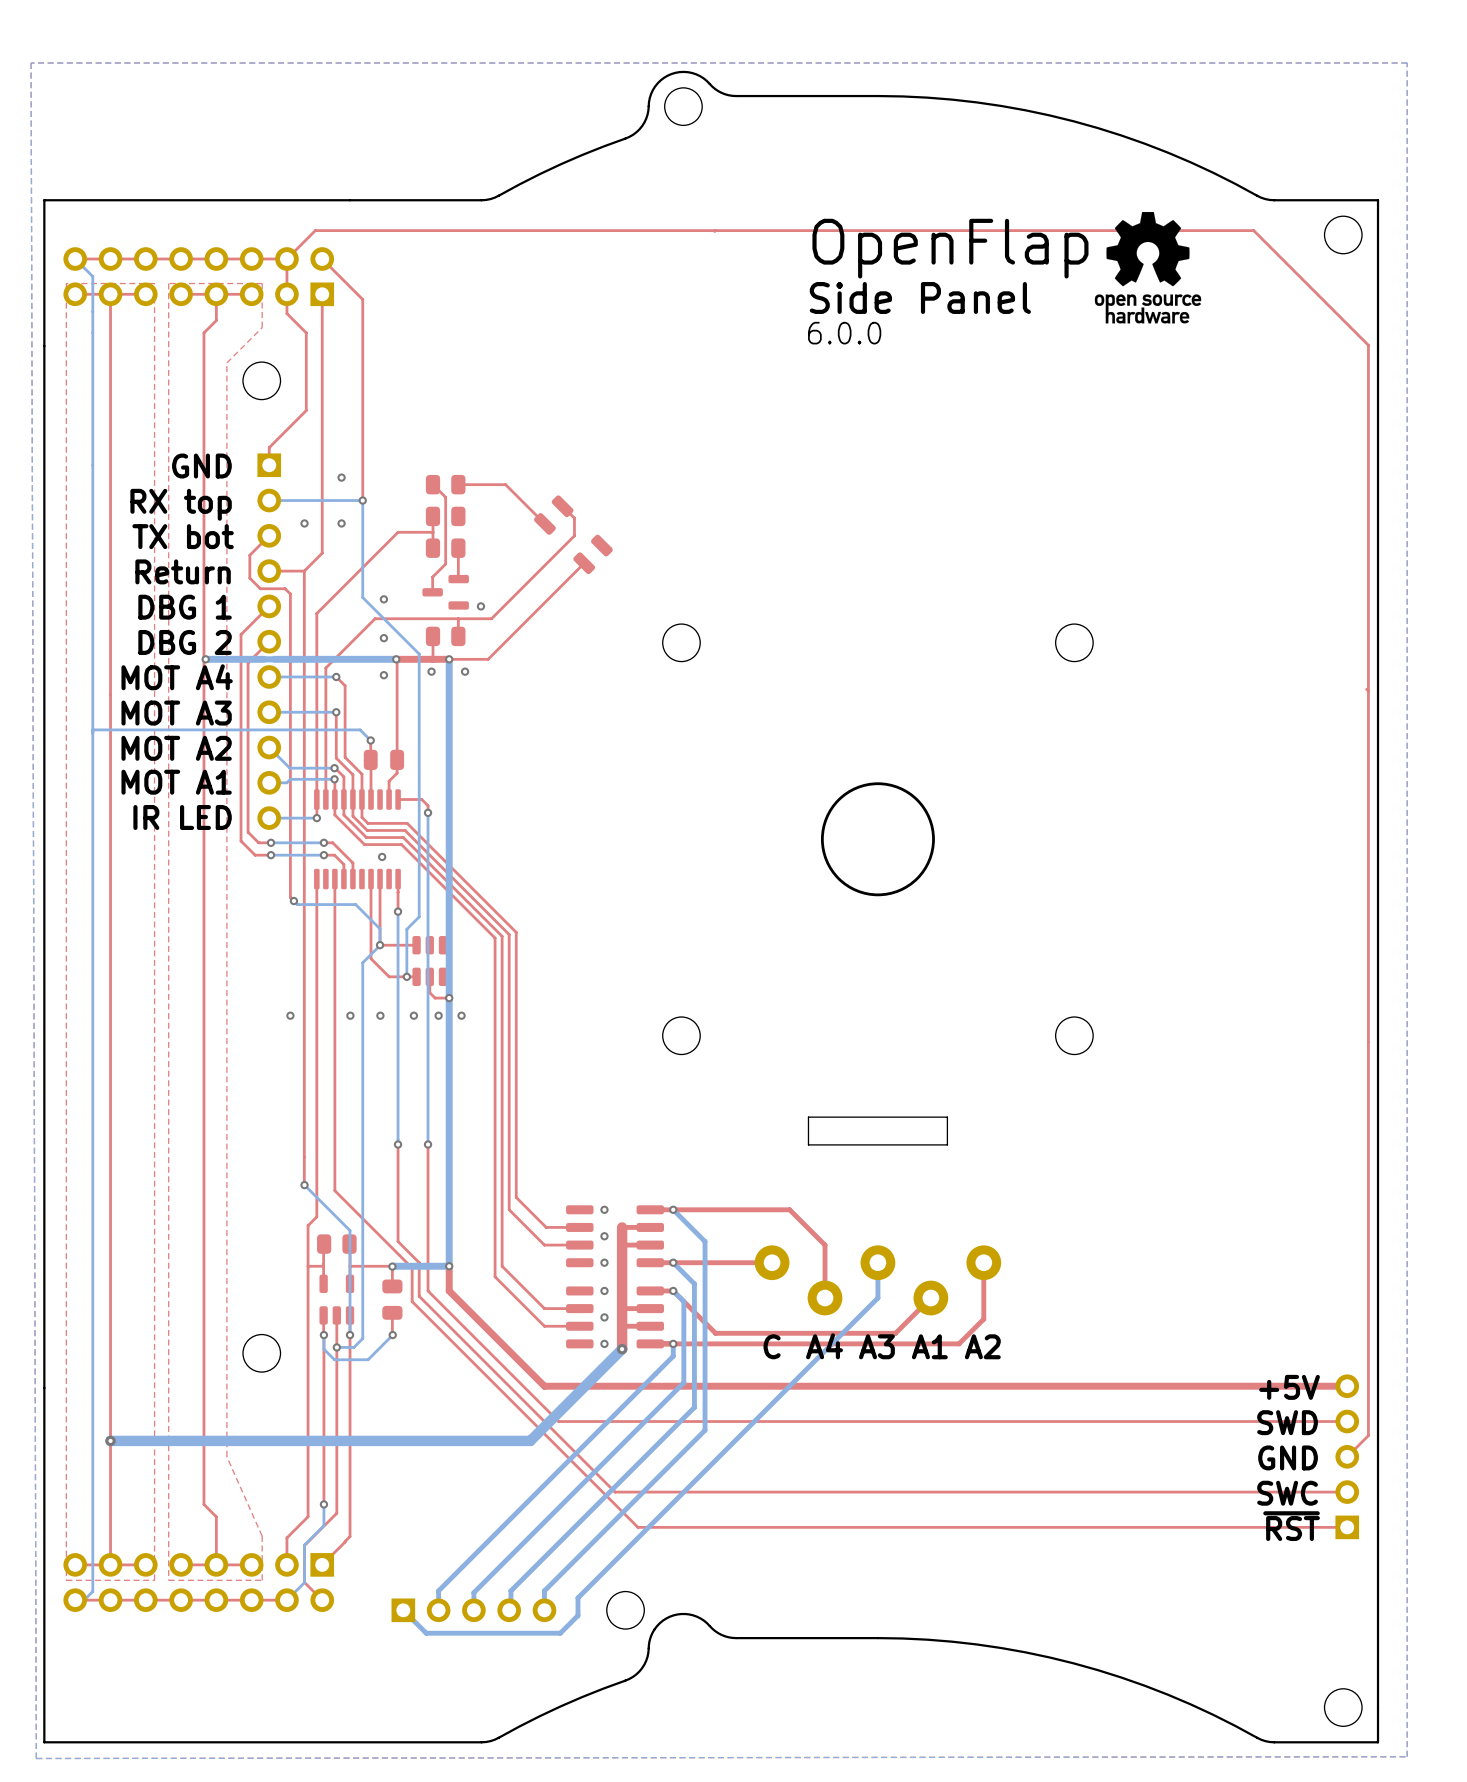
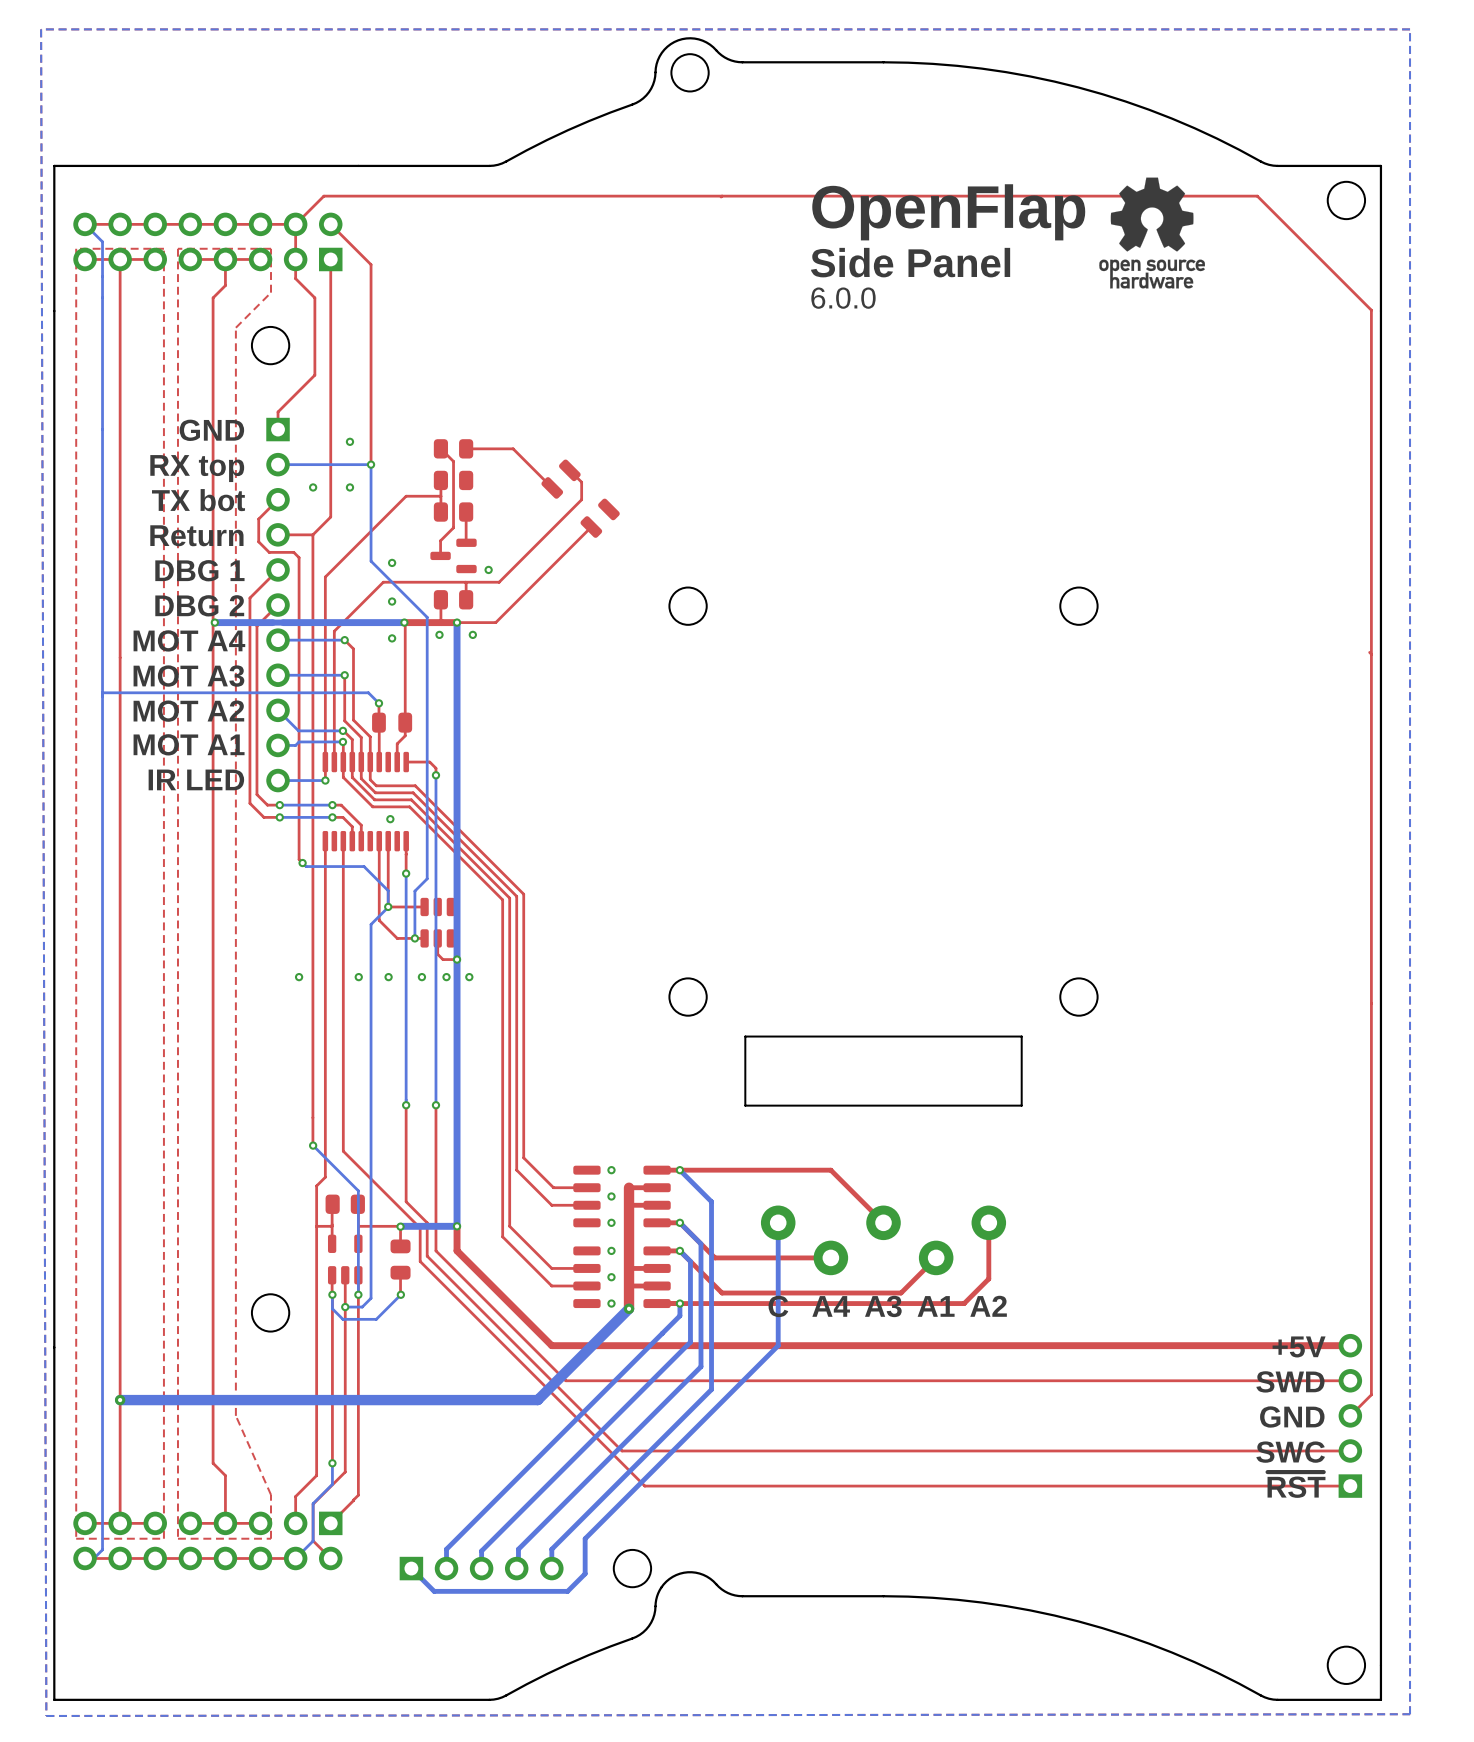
round board edge: [820, 782, 935, 897] -> none
board edge: (947, 1144) (947, 1117) (808, 1117) (808, 1144) -> (952, 1105) (1021, 1105) (1021, 1036) (745, 1036) (745, 1105) (814, 1105)
top track: (789, 1209) (825, 1245) (825, 1298) -> (795, 1170) (830, 1170) (883, 1222)
top track: (772, 1262) (673, 1262) -> (830, 1257) (715, 1257) (679, 1222)
bottom track: (877, 1262) (877, 1298) (578, 1597) -> (778, 1222) (778, 1345) (585, 1538) (585, 1556)

